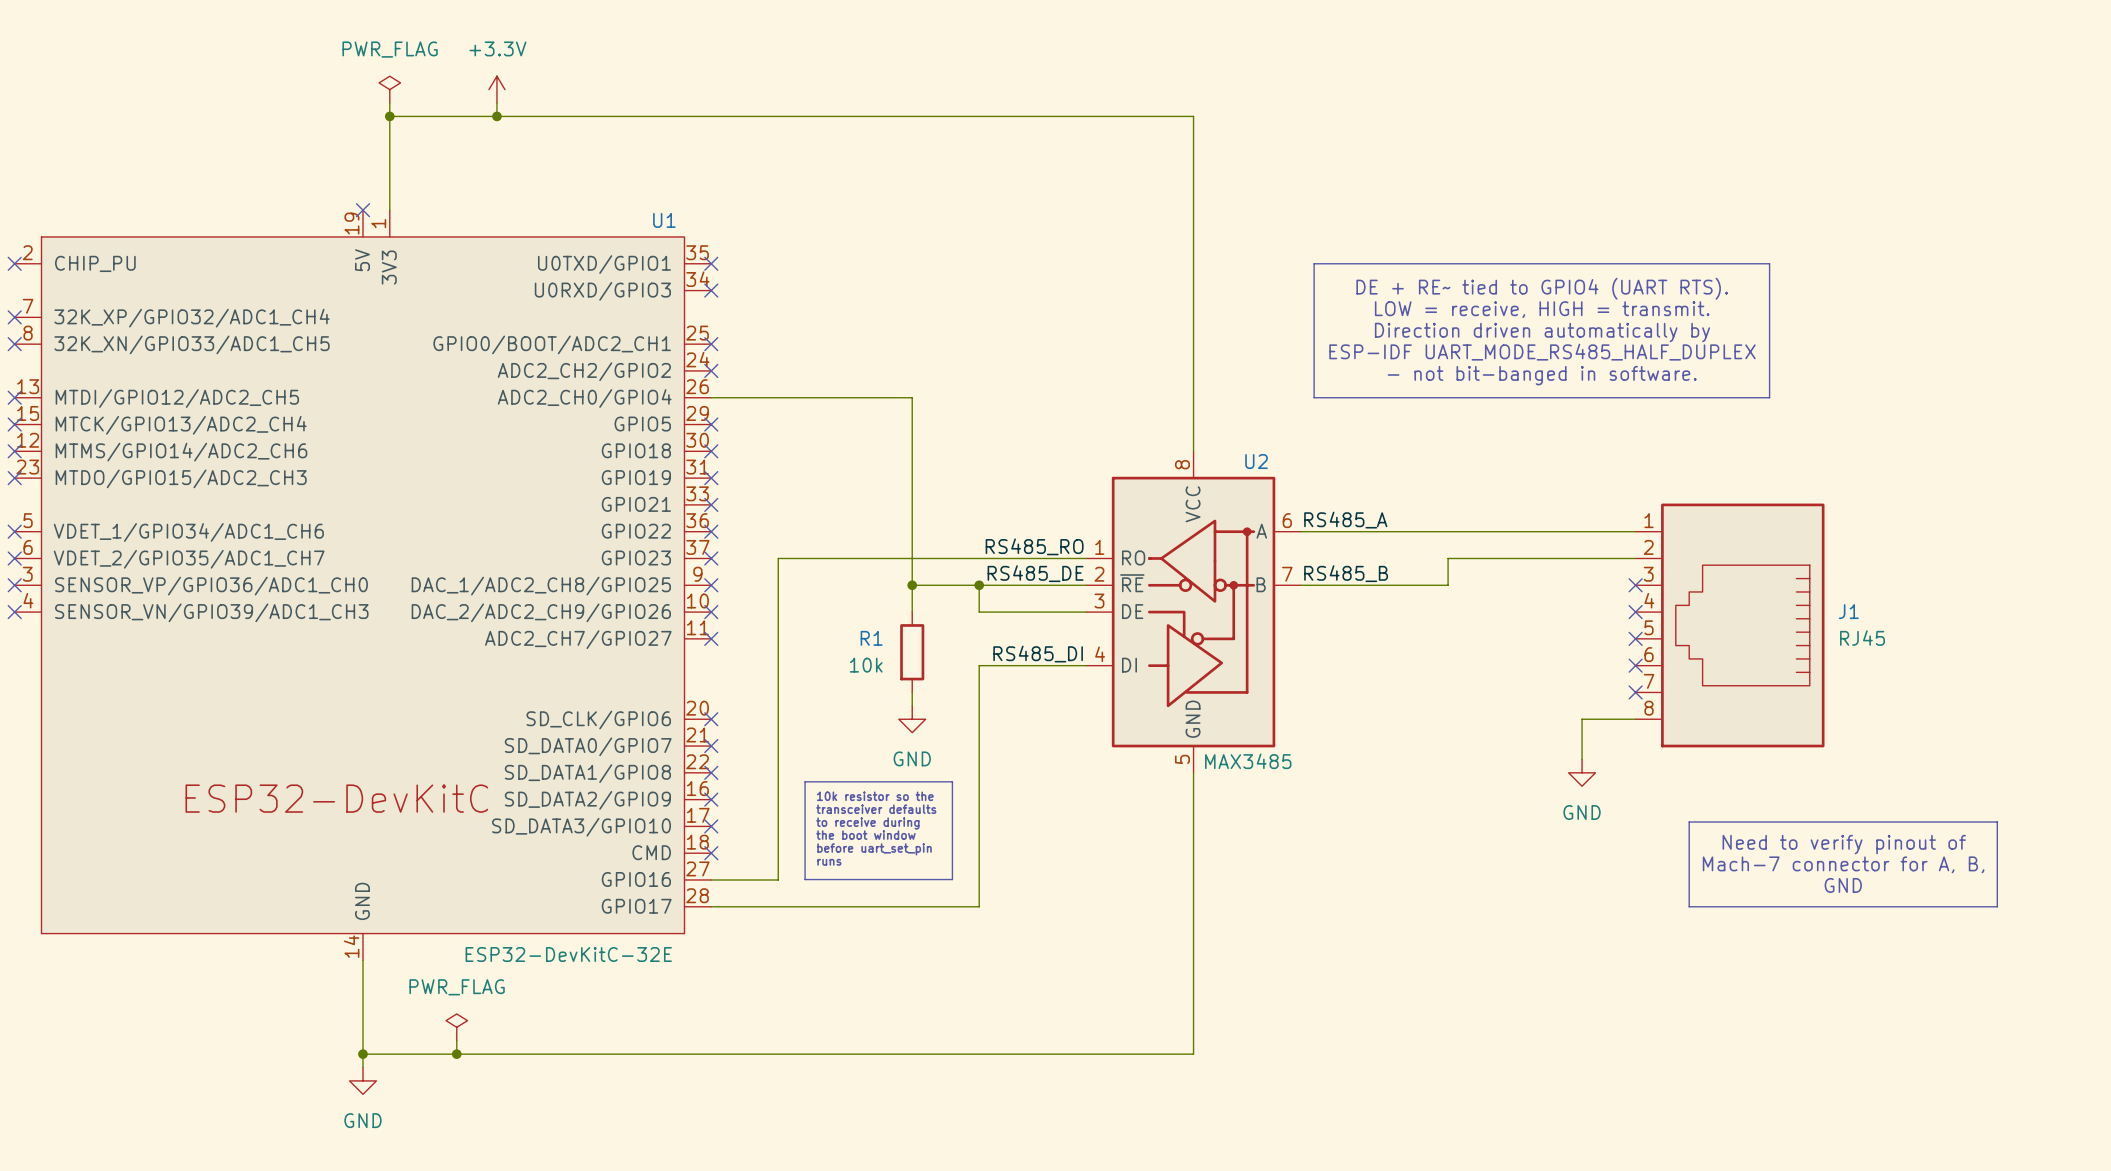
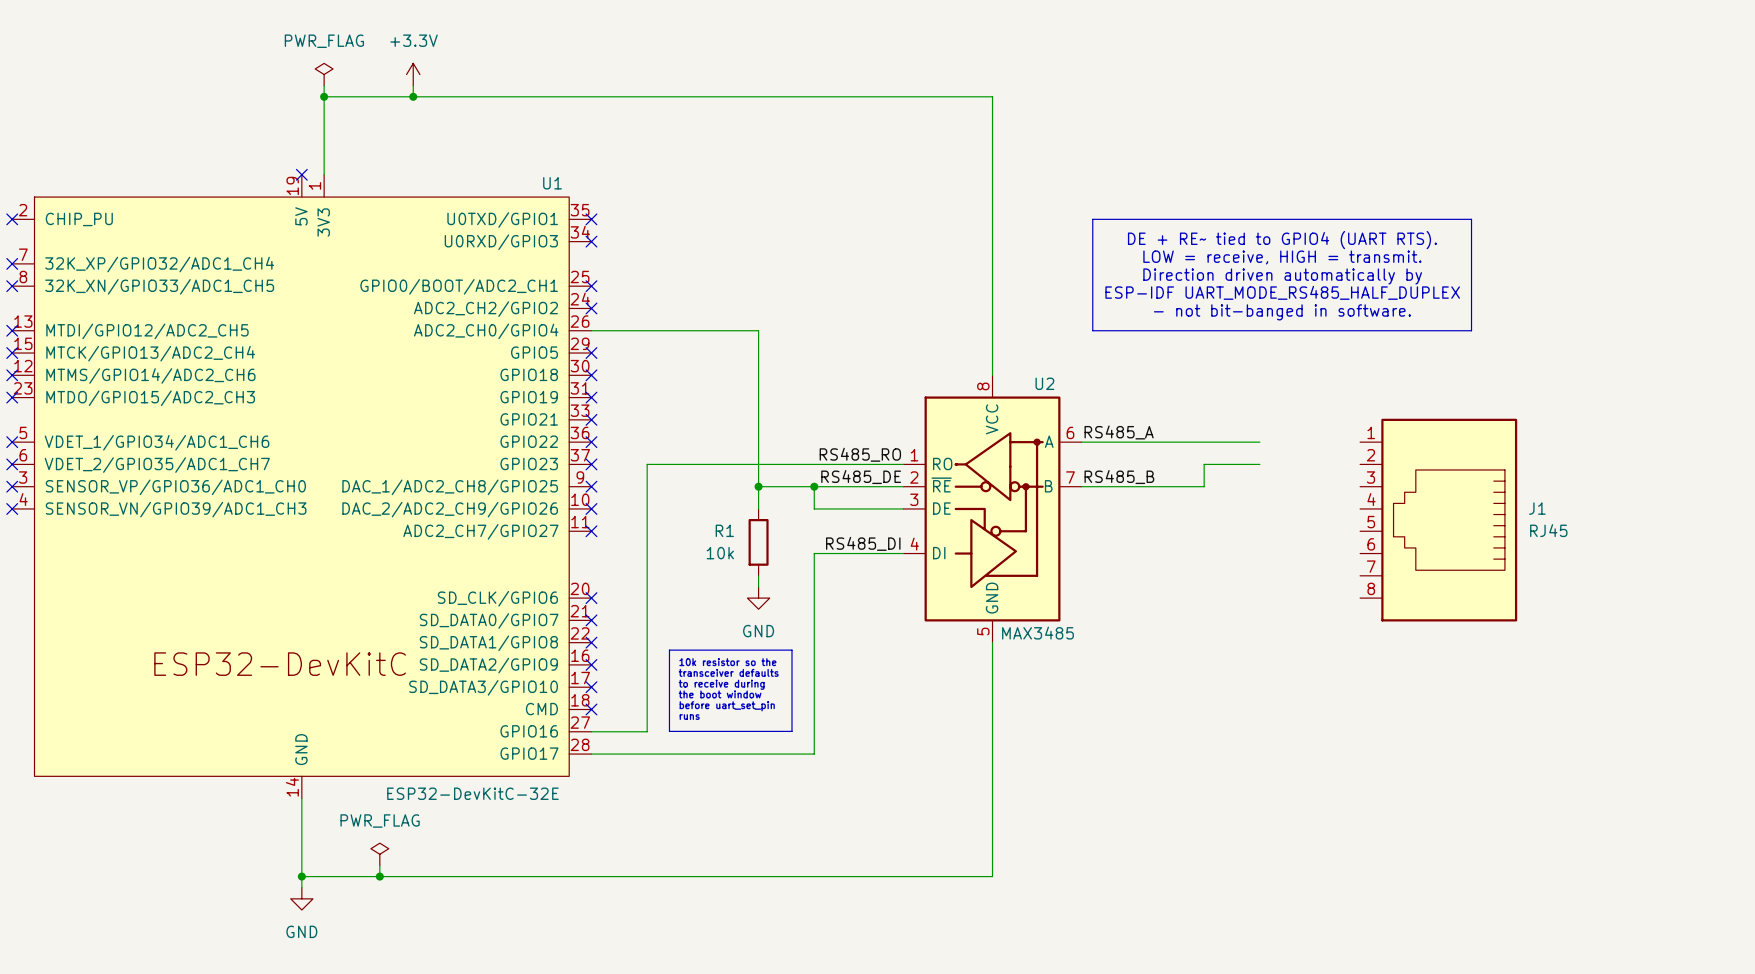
wire: (1515, 531) (1635, 531) -> none
wire: (1515, 558) (1635, 558) -> none
no-connect mark: (1635, 585) -> none
no-connect mark: (1635, 612) -> none
no-connect mark: (1635, 638) -> none
no-connect mark: (1635, 665) -> none
no-connect mark: (1635, 692) -> none
wire: (1635, 719) (1582, 719) (1582, 759) -> none
power symbol: GND (1582, 772) -> none
line: (1689, 822) (1997, 822) (1997, 906) (1689, 906) (1689, 822) -> none
text: Need to verify pinout of (1844, 844) -> none
text: Mach-7 connector for A, B, (1843, 864) -> none
text: GND (1843, 885) -> none

